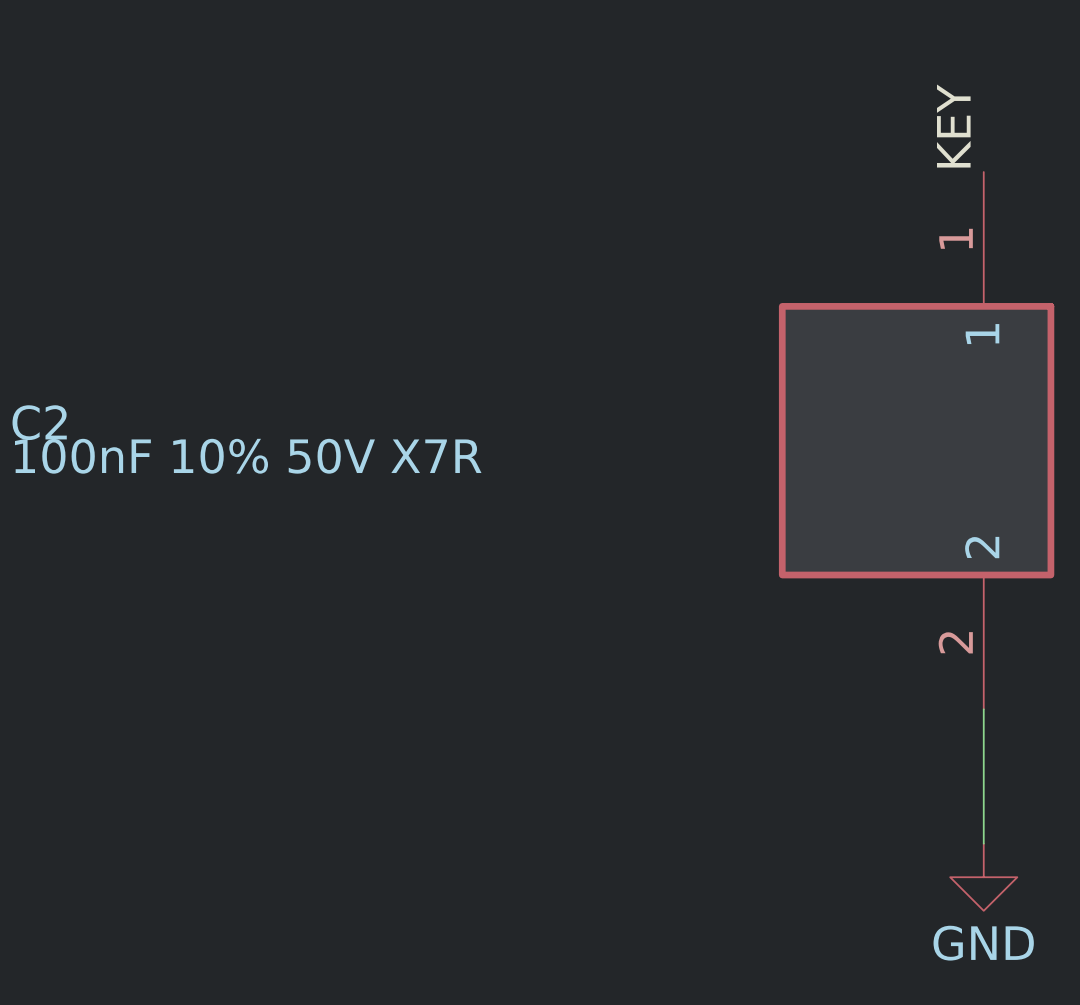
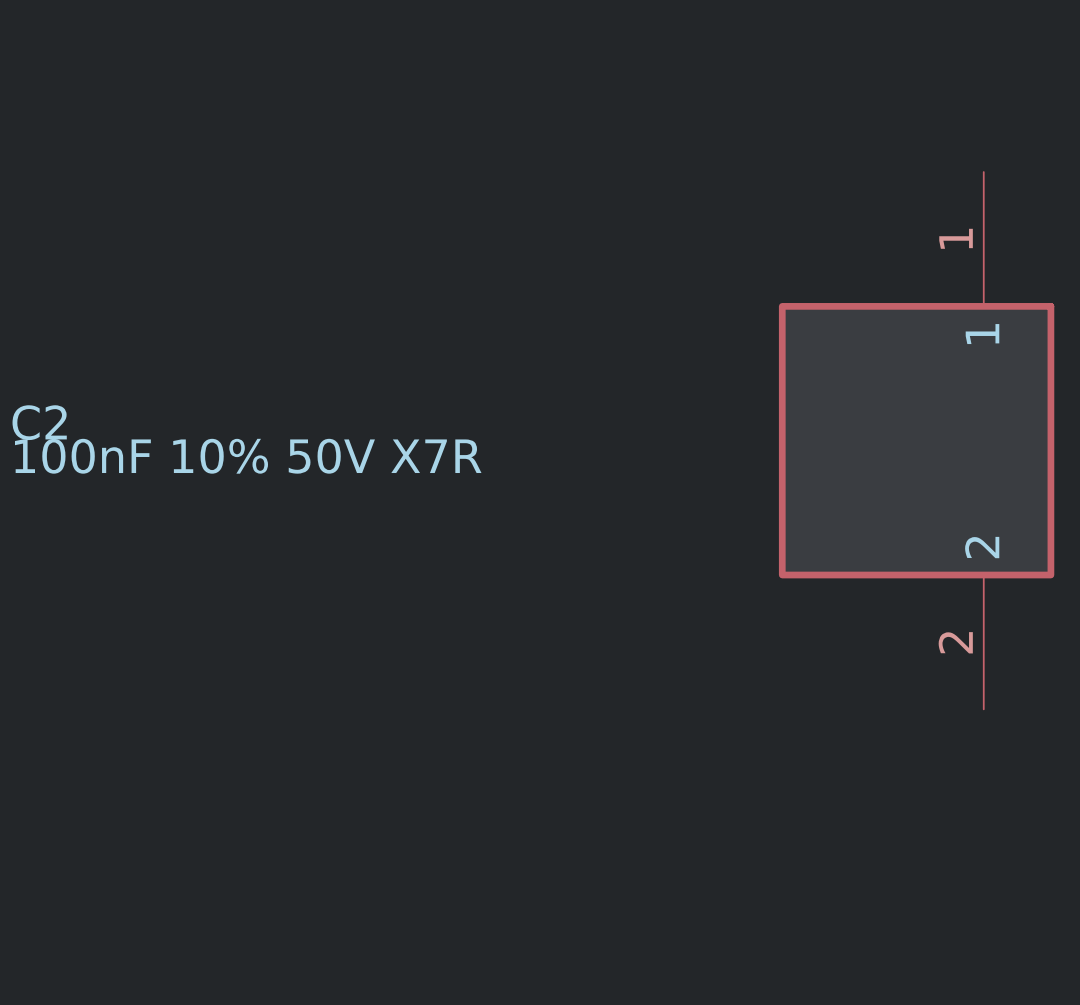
label: KEY (953, 126) -> none
wire: (983, 709) (983, 843) -> none
power symbol: GND (983, 877) -> none

